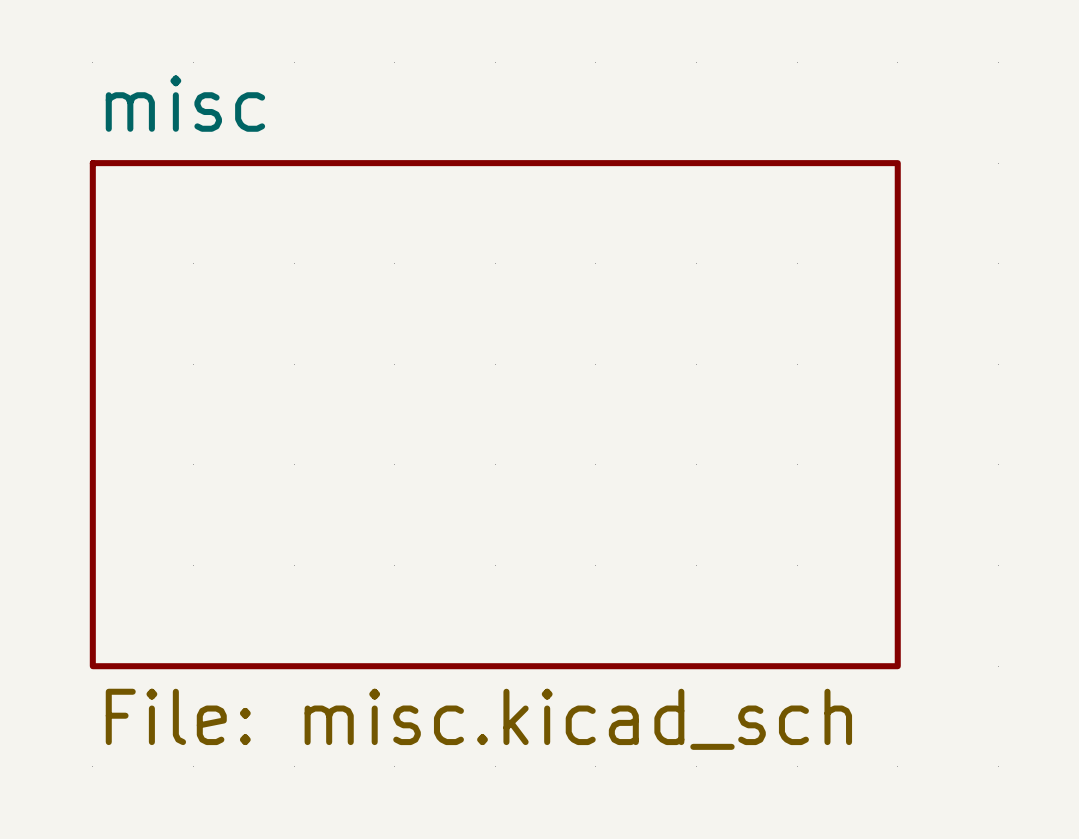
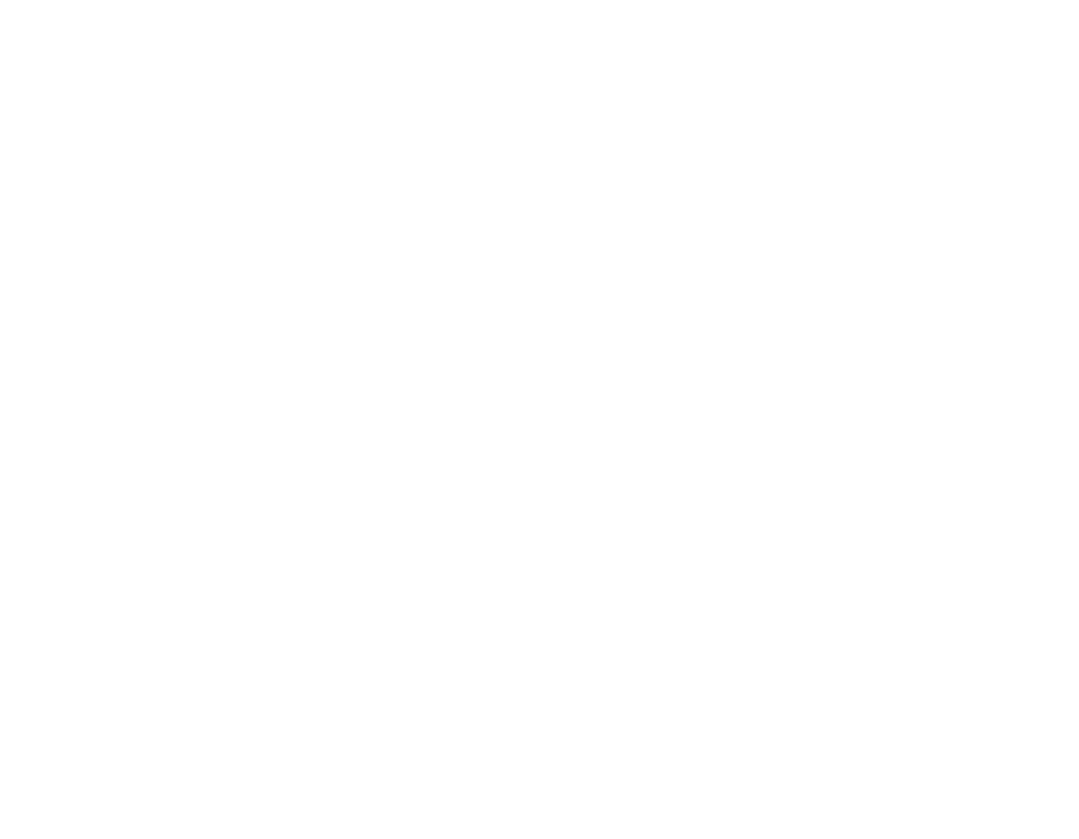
sheet misc: File: misc.kicad_sch (495, 414) -> none

